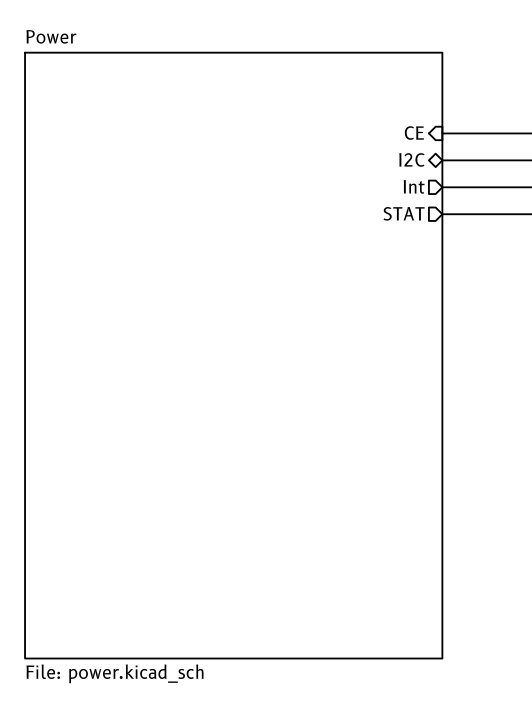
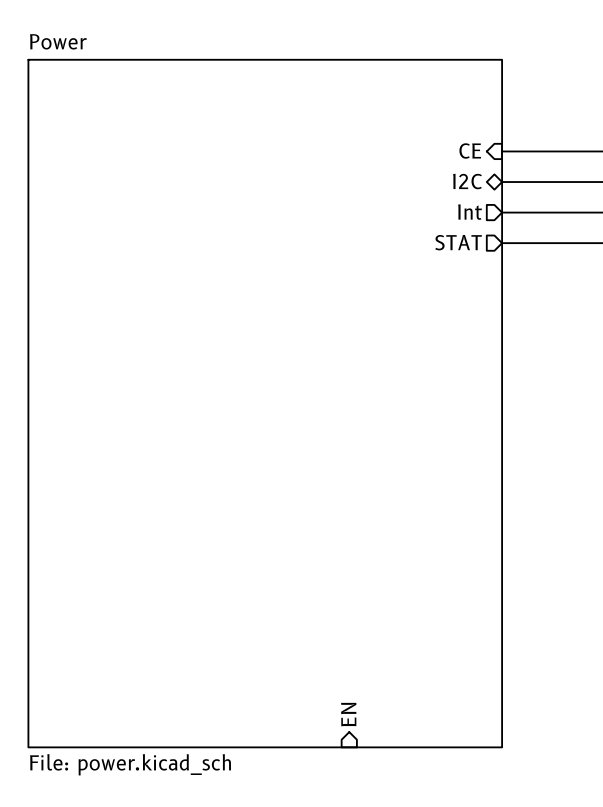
sheet pin: none -> EN (348, 714)

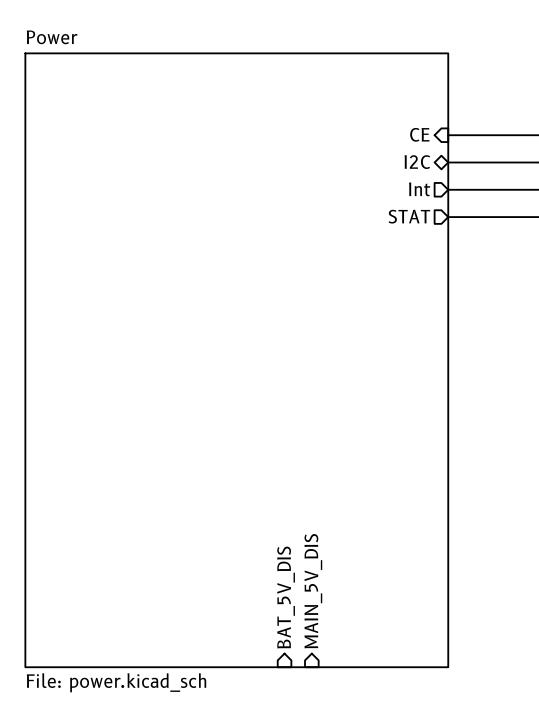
sheet pin: none -> BAT_5V_DIS (286, 597)
sheet pin: EN (348, 714) -> MAIN_5V_DIS (313, 591)

